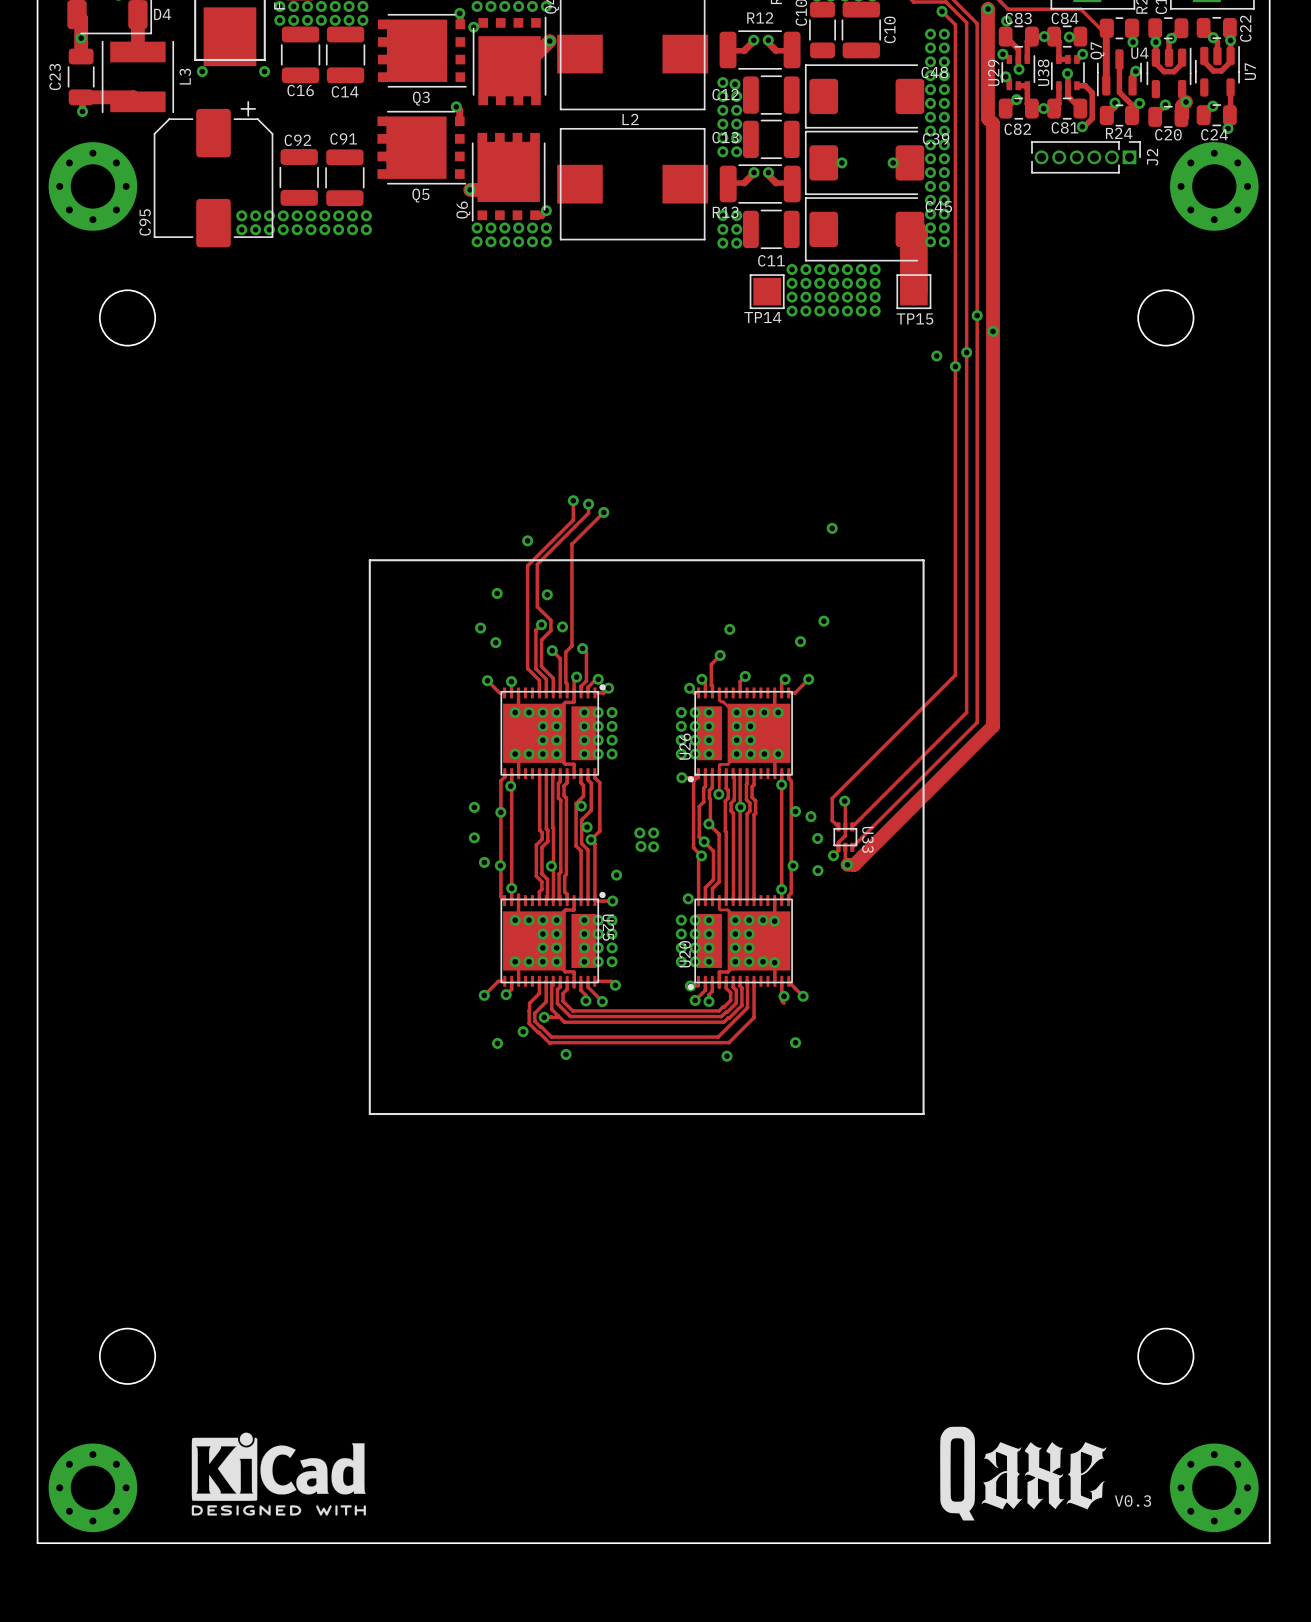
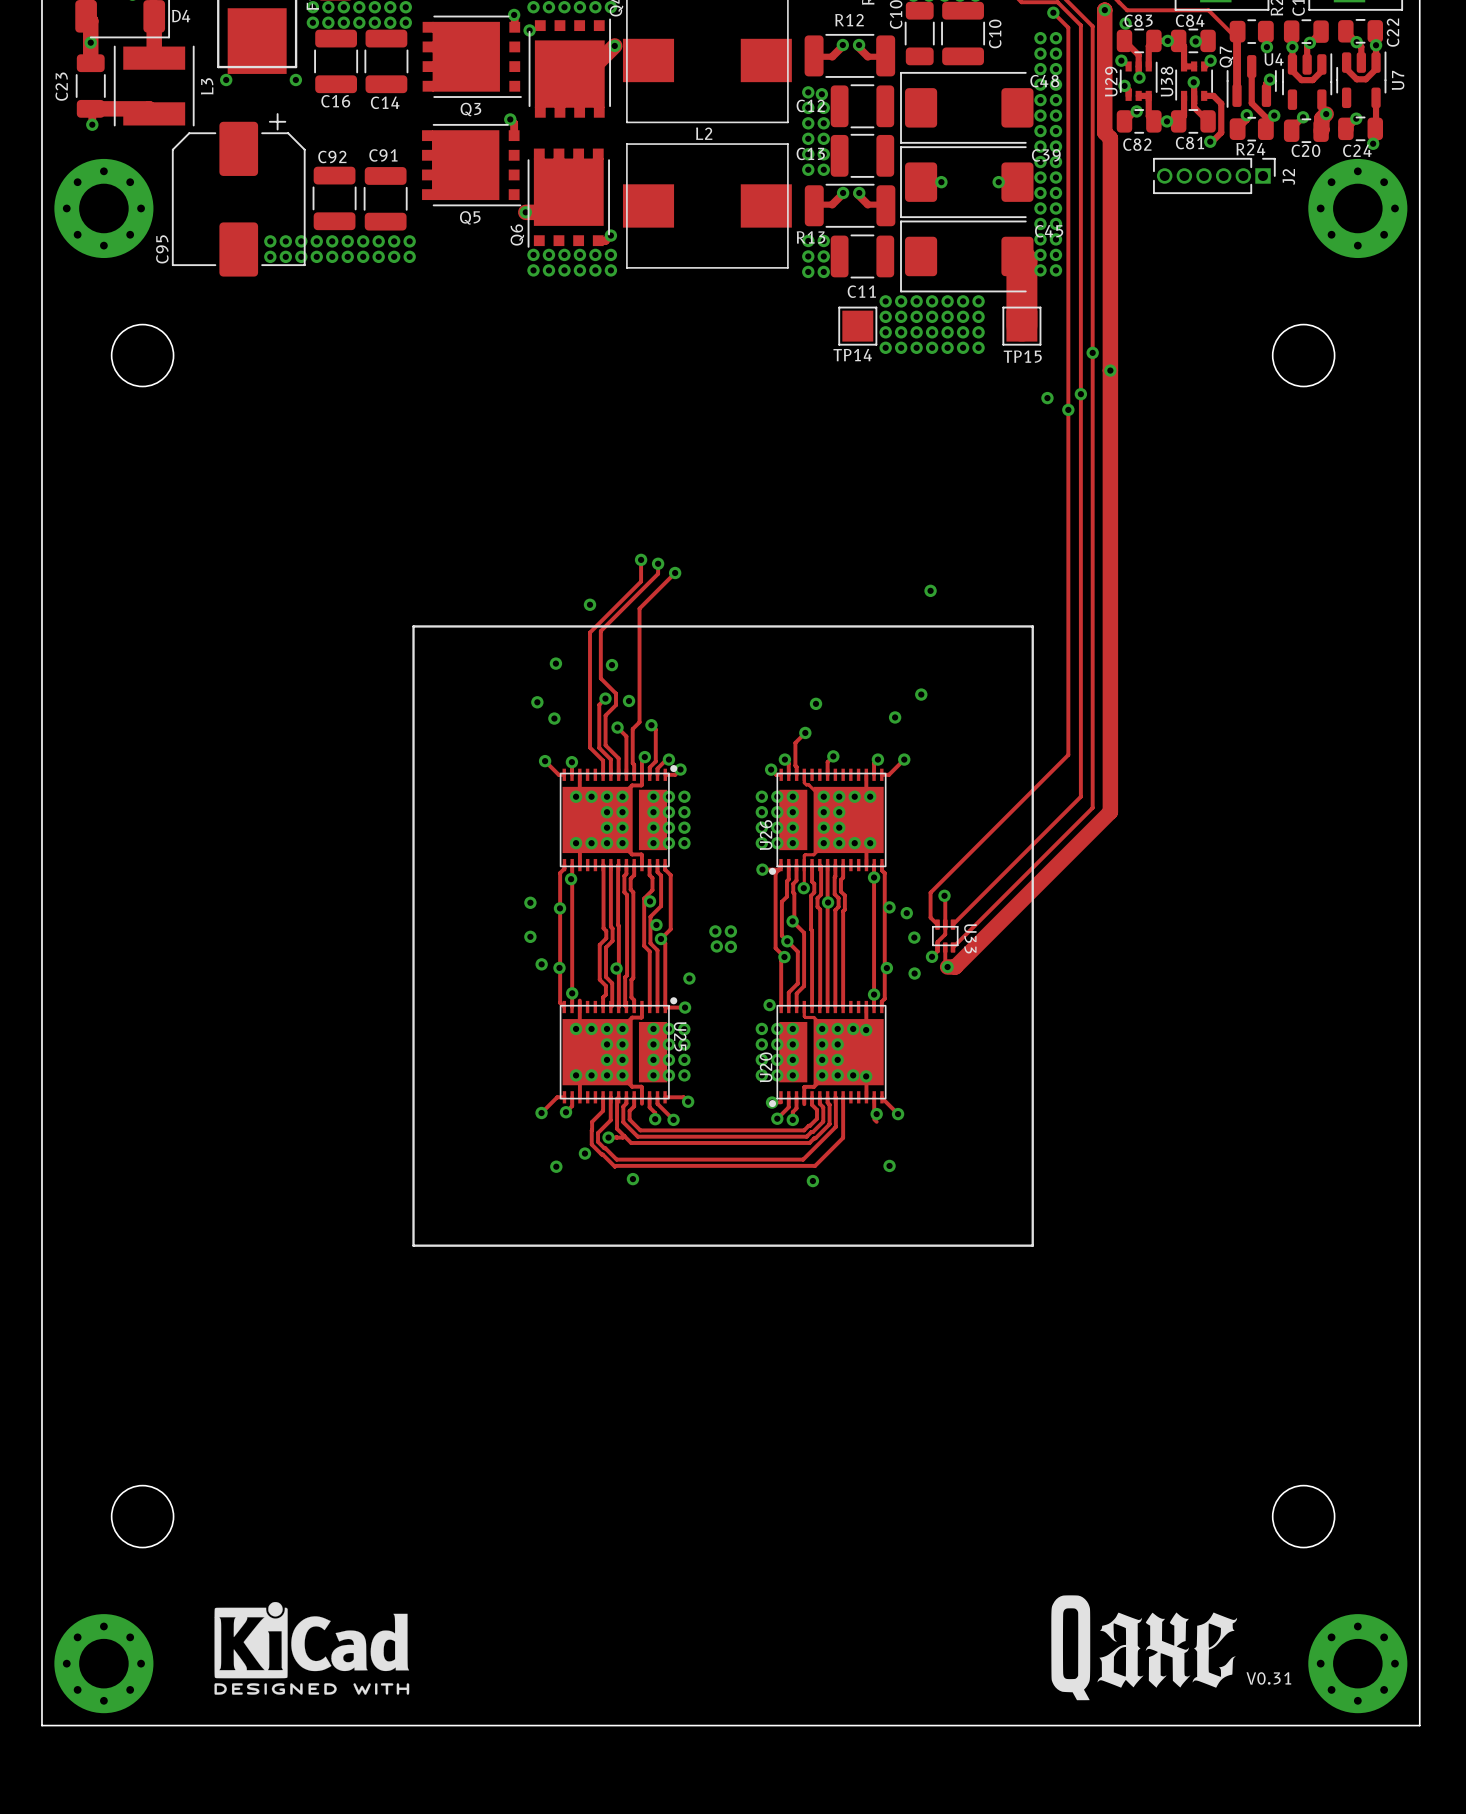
text: V0.3 (1132, 1500) -> V0.31 (1268, 1678)

